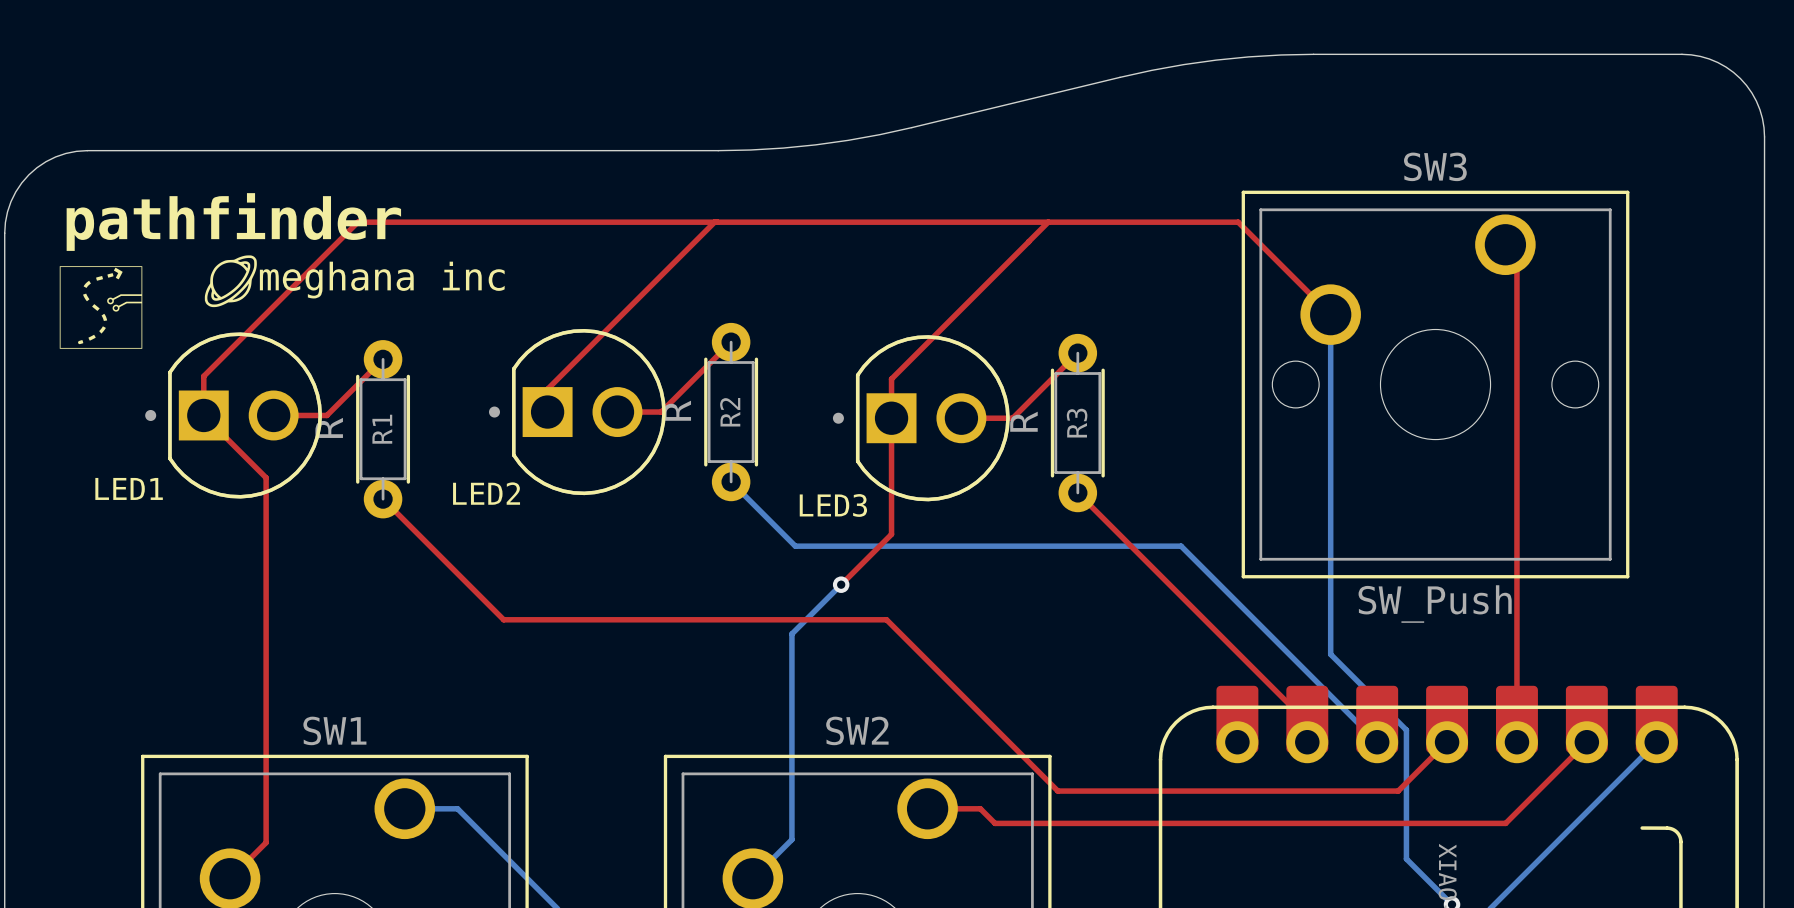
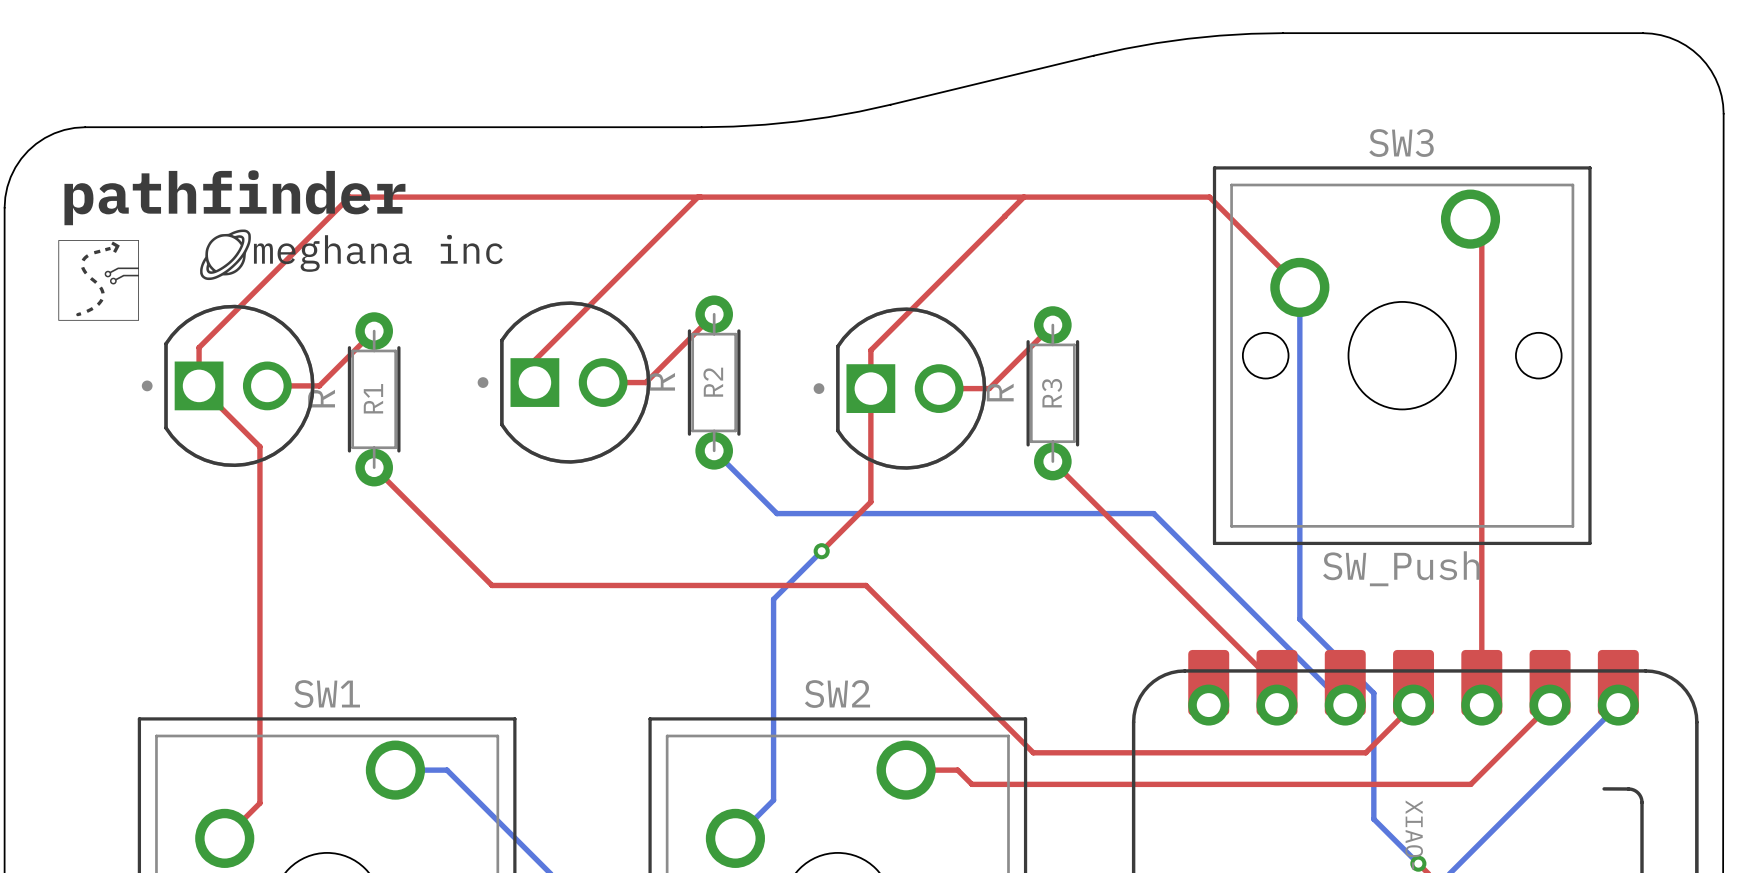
LED1 name: LED1 (129, 488) -> none
LED2 name: LED2 (486, 493) -> none
LED3 name: LED3 (833, 505) -> none

